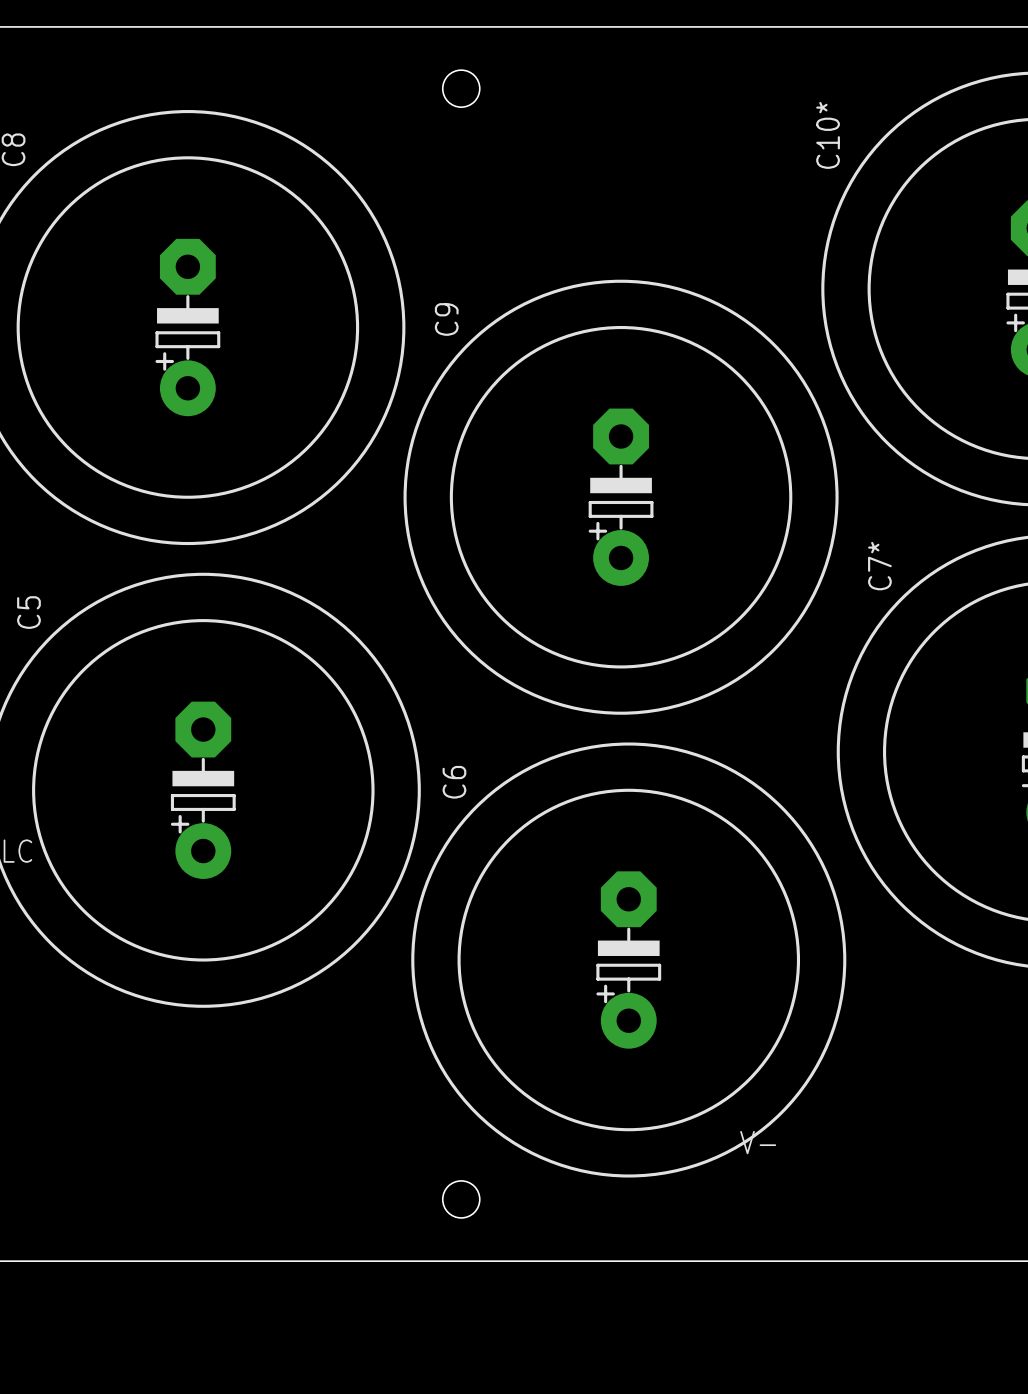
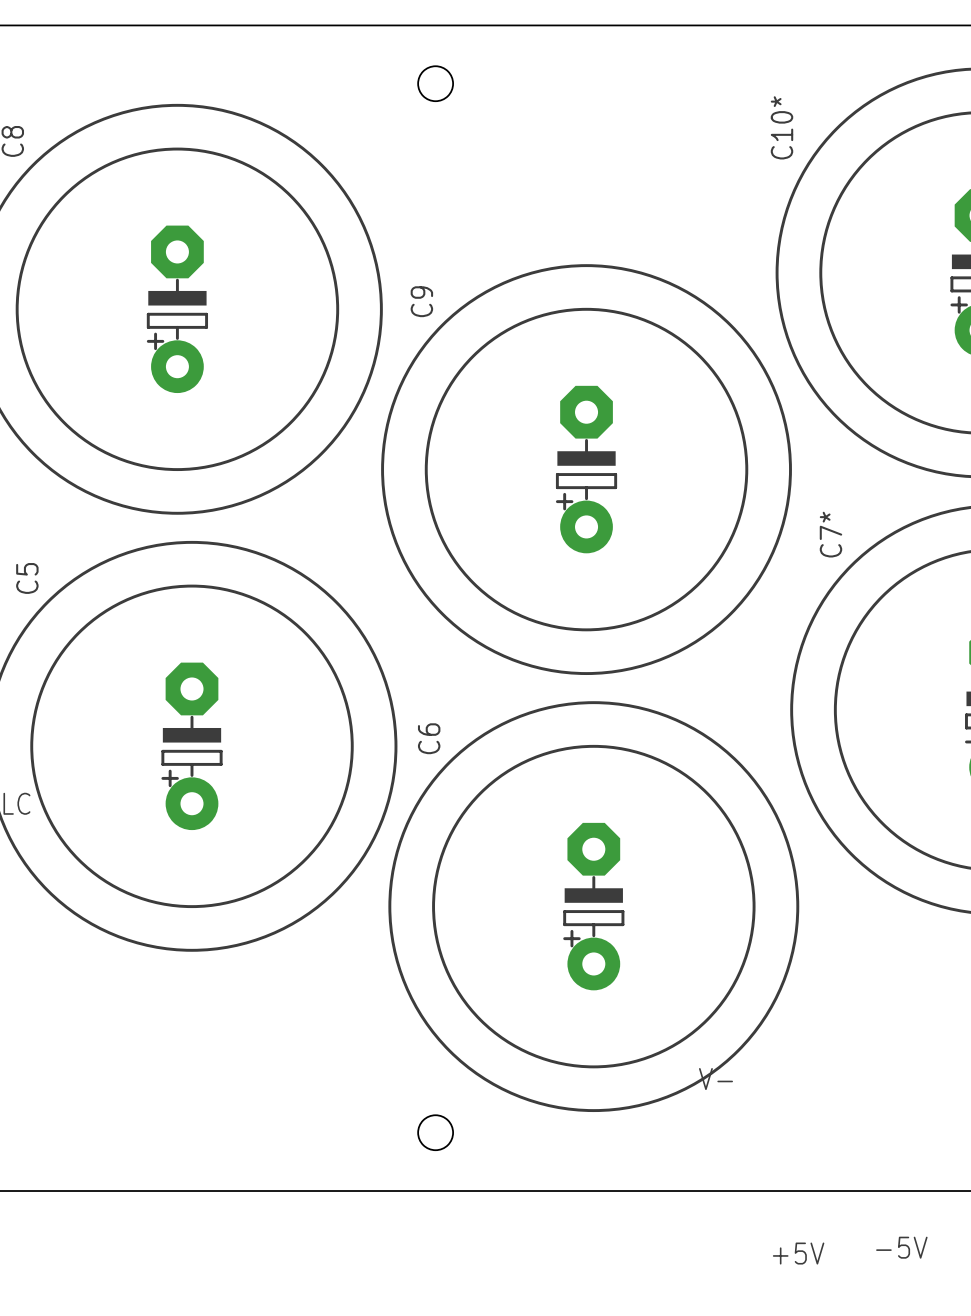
text: none -> -5V (901, 1247)
text: none -> +5V (798, 1253)

